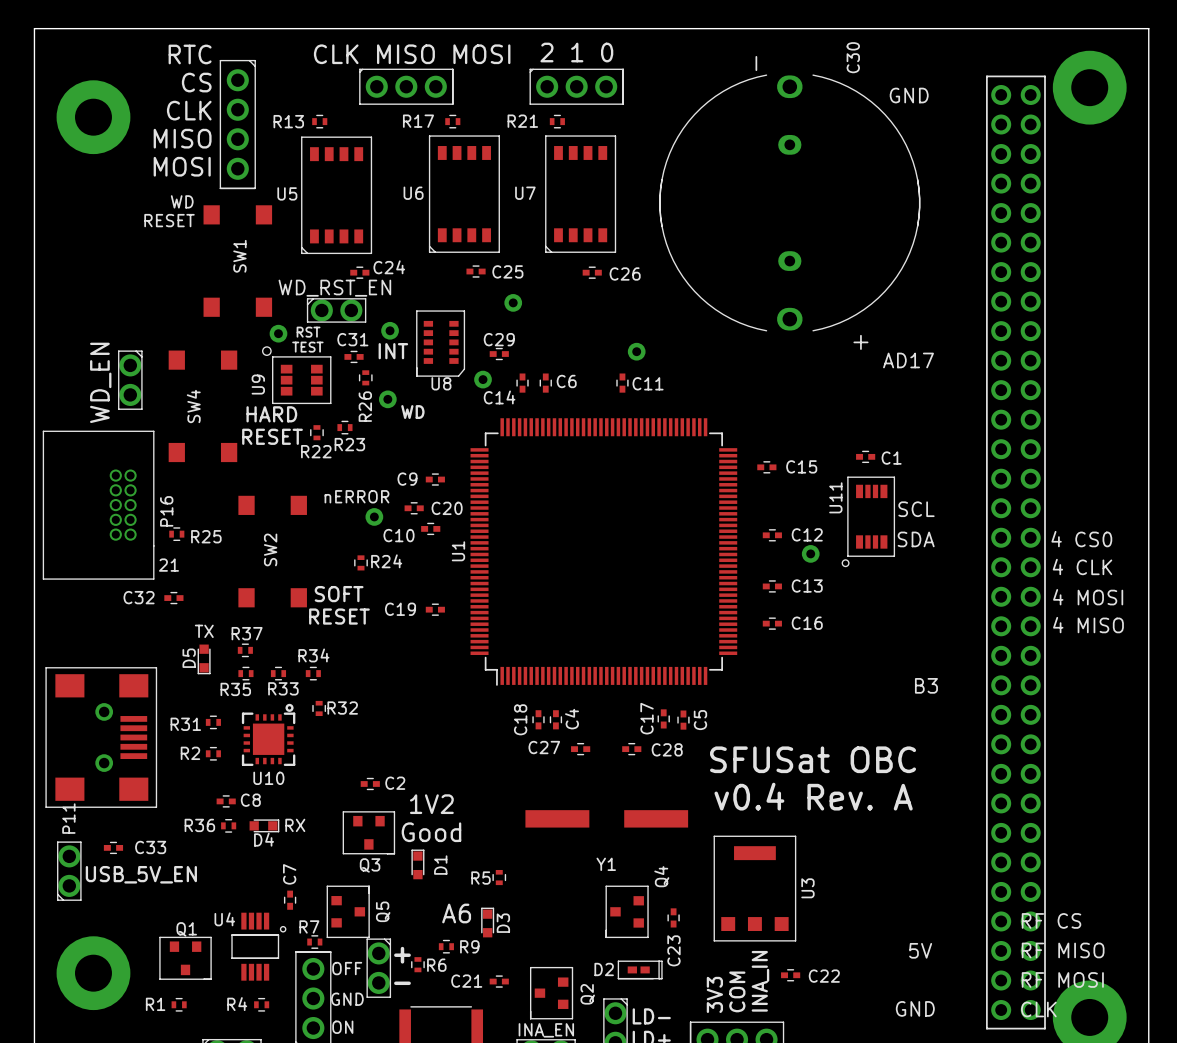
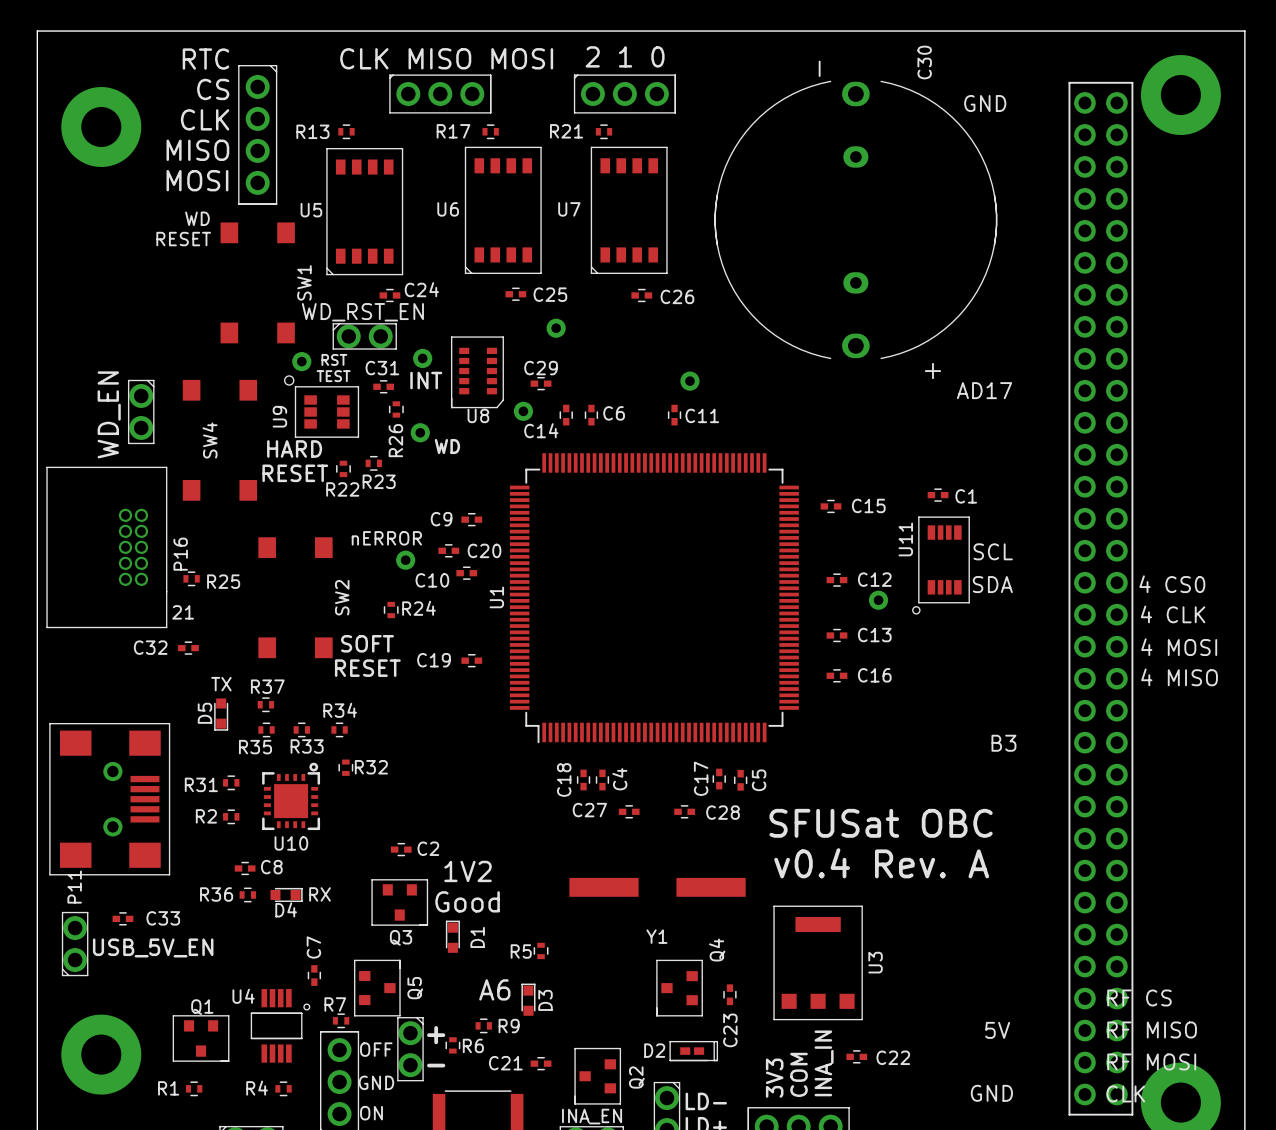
SW1 name position: SW1 (239, 256) -> SW1 (304, 282)
SW2 name position: SW2 (270, 549) -> SW2 (342, 597)

